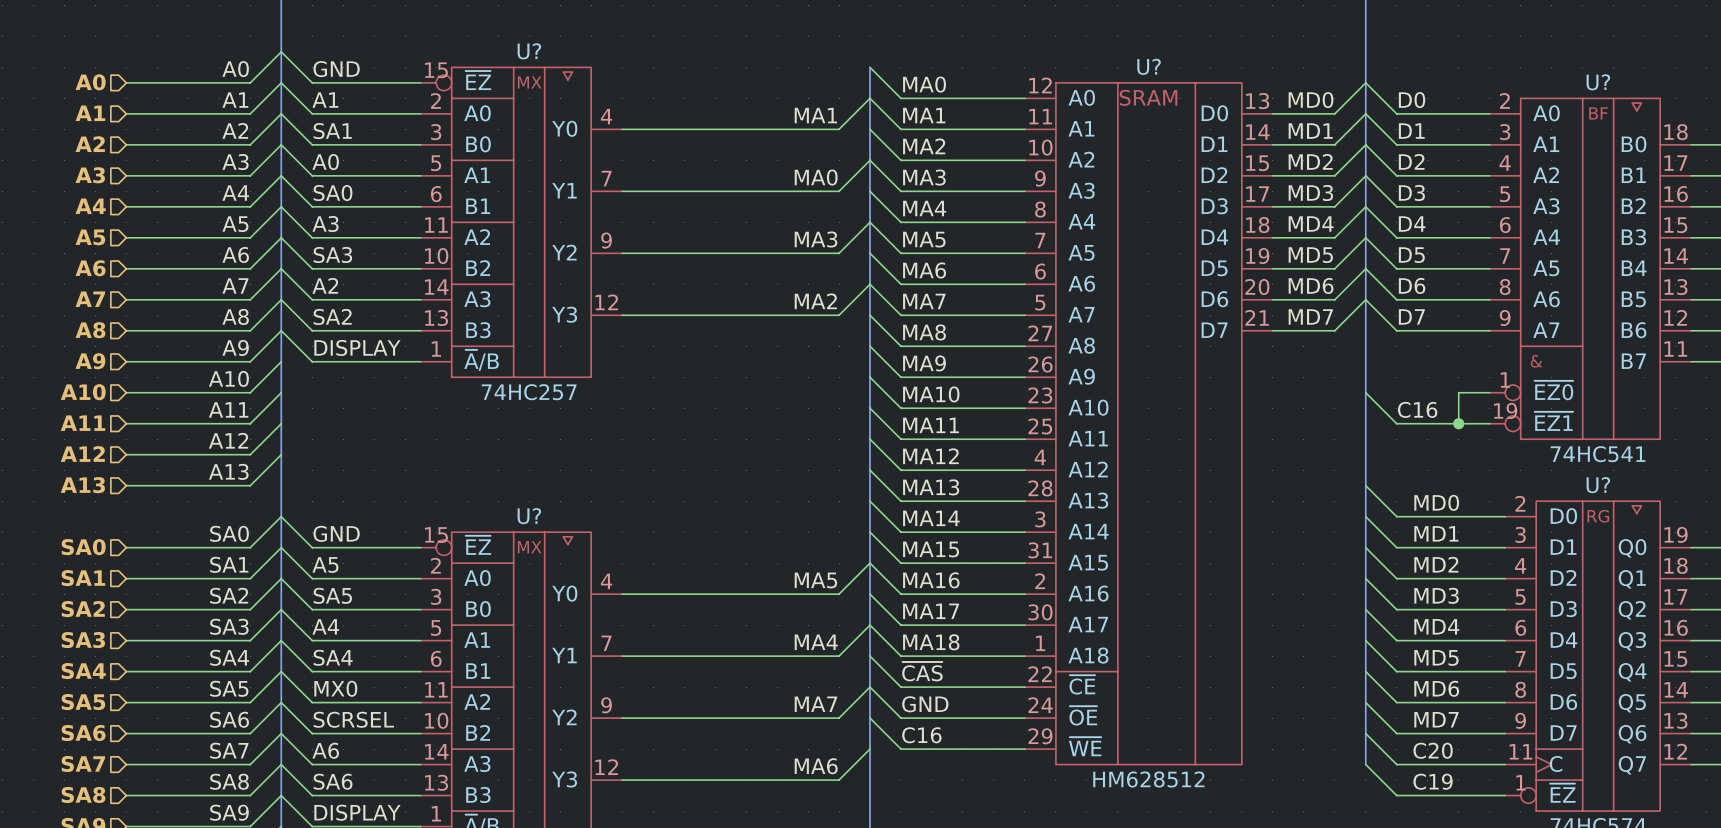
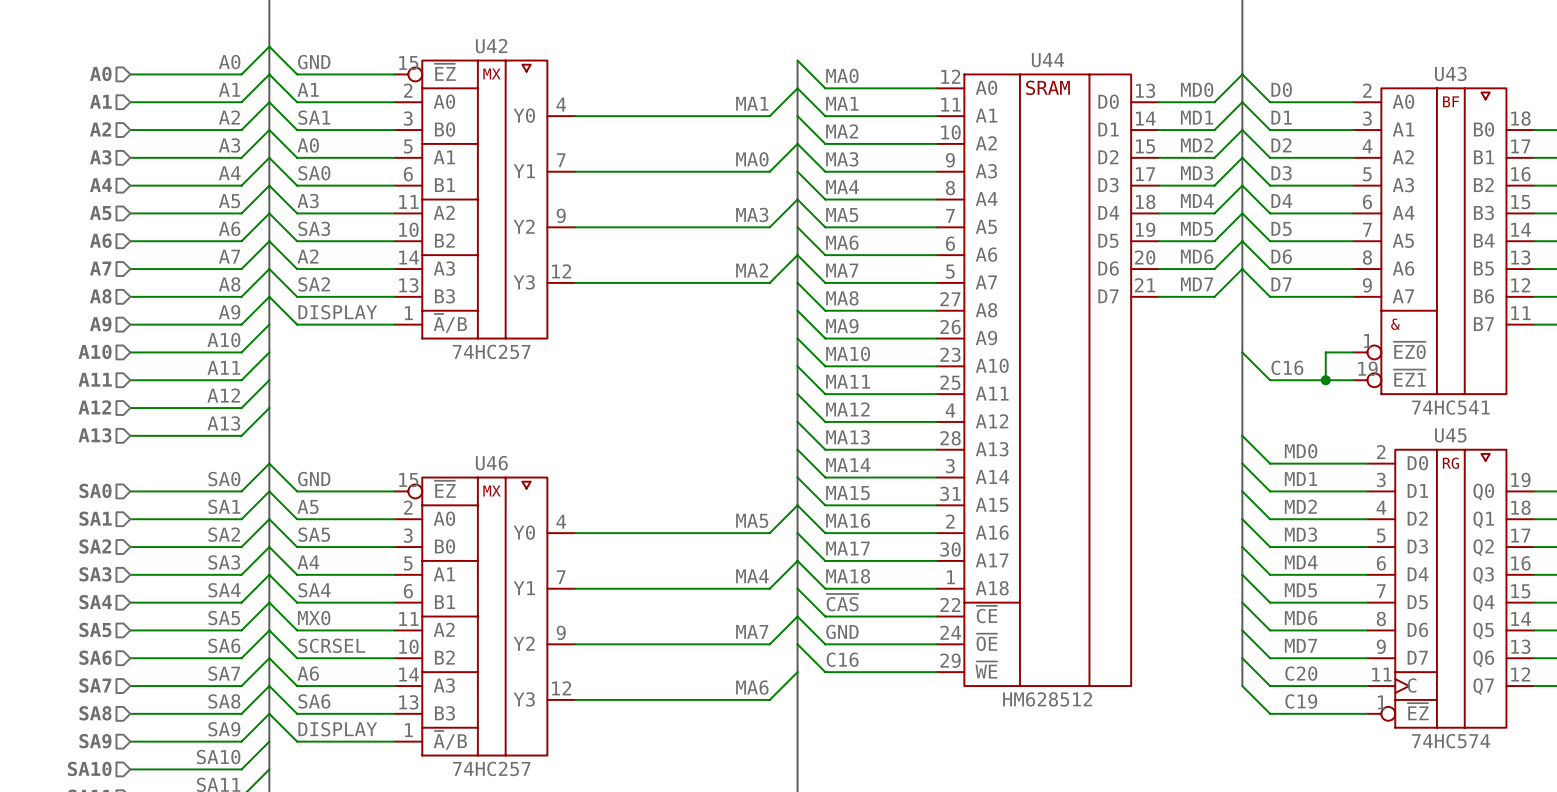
U? name: U? (529, 51) -> U42 (491, 46)
U? name: U? (1149, 66) -> U44 (1047, 60)
U? name: U? (1598, 82) -> U43 (1450, 73)
U? name: U? (1598, 485) -> U45 (1450, 435)
U? name: U? (529, 516) -> U46 (491, 463)

